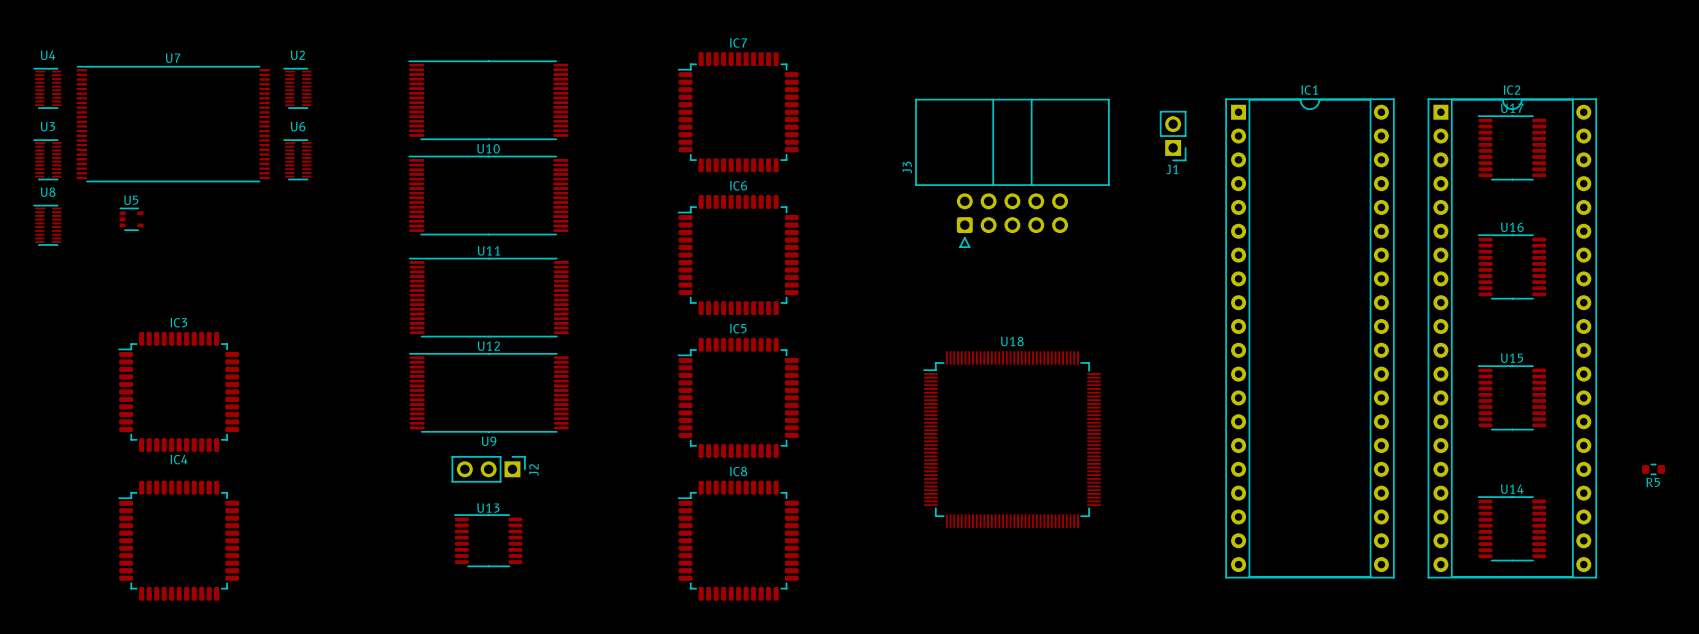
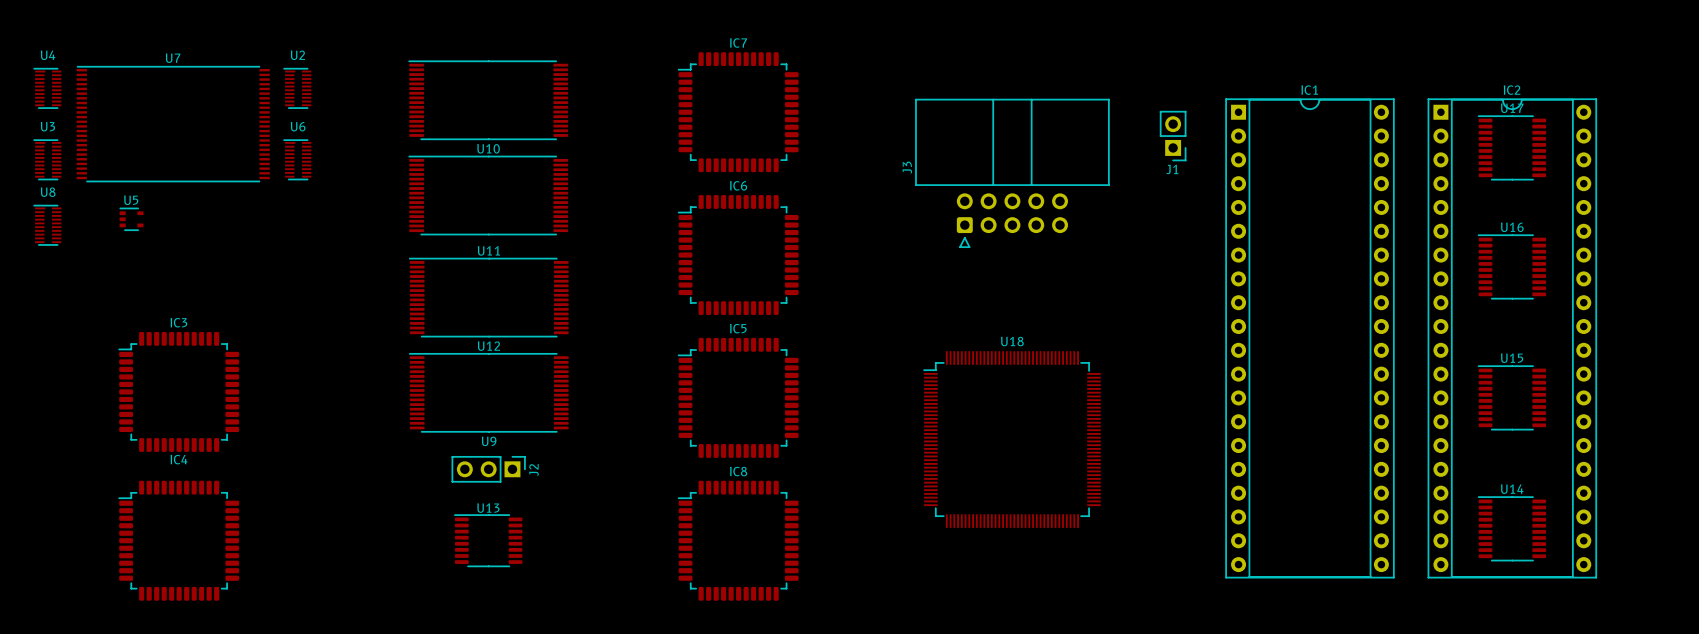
R5: (1653, 469) -> none

